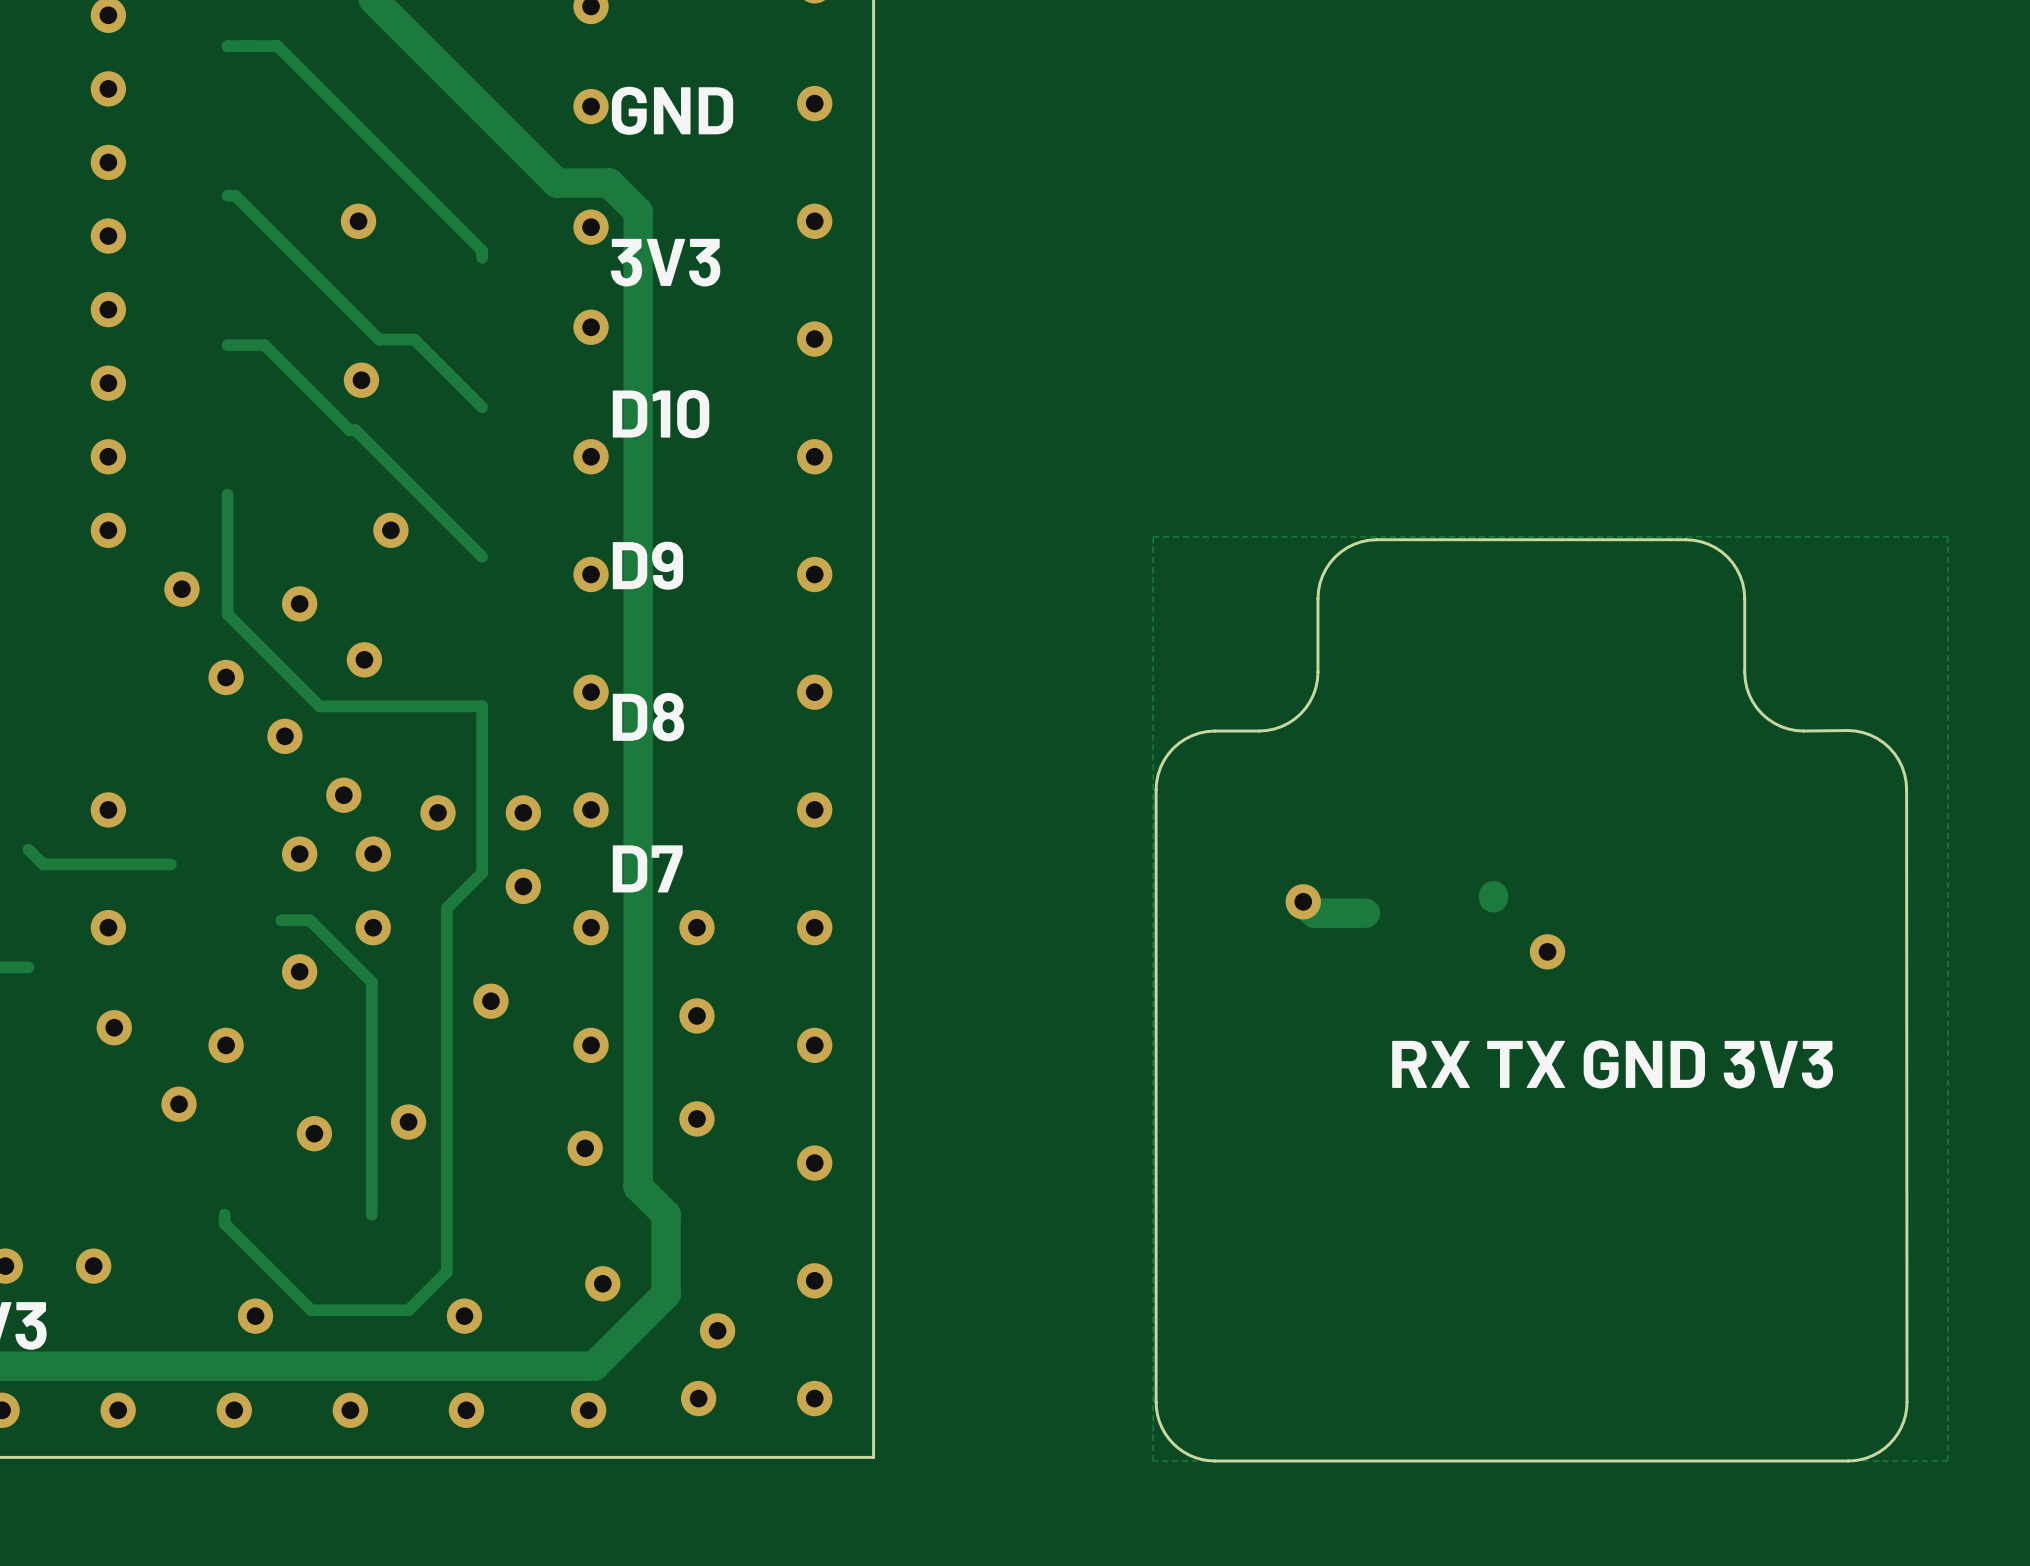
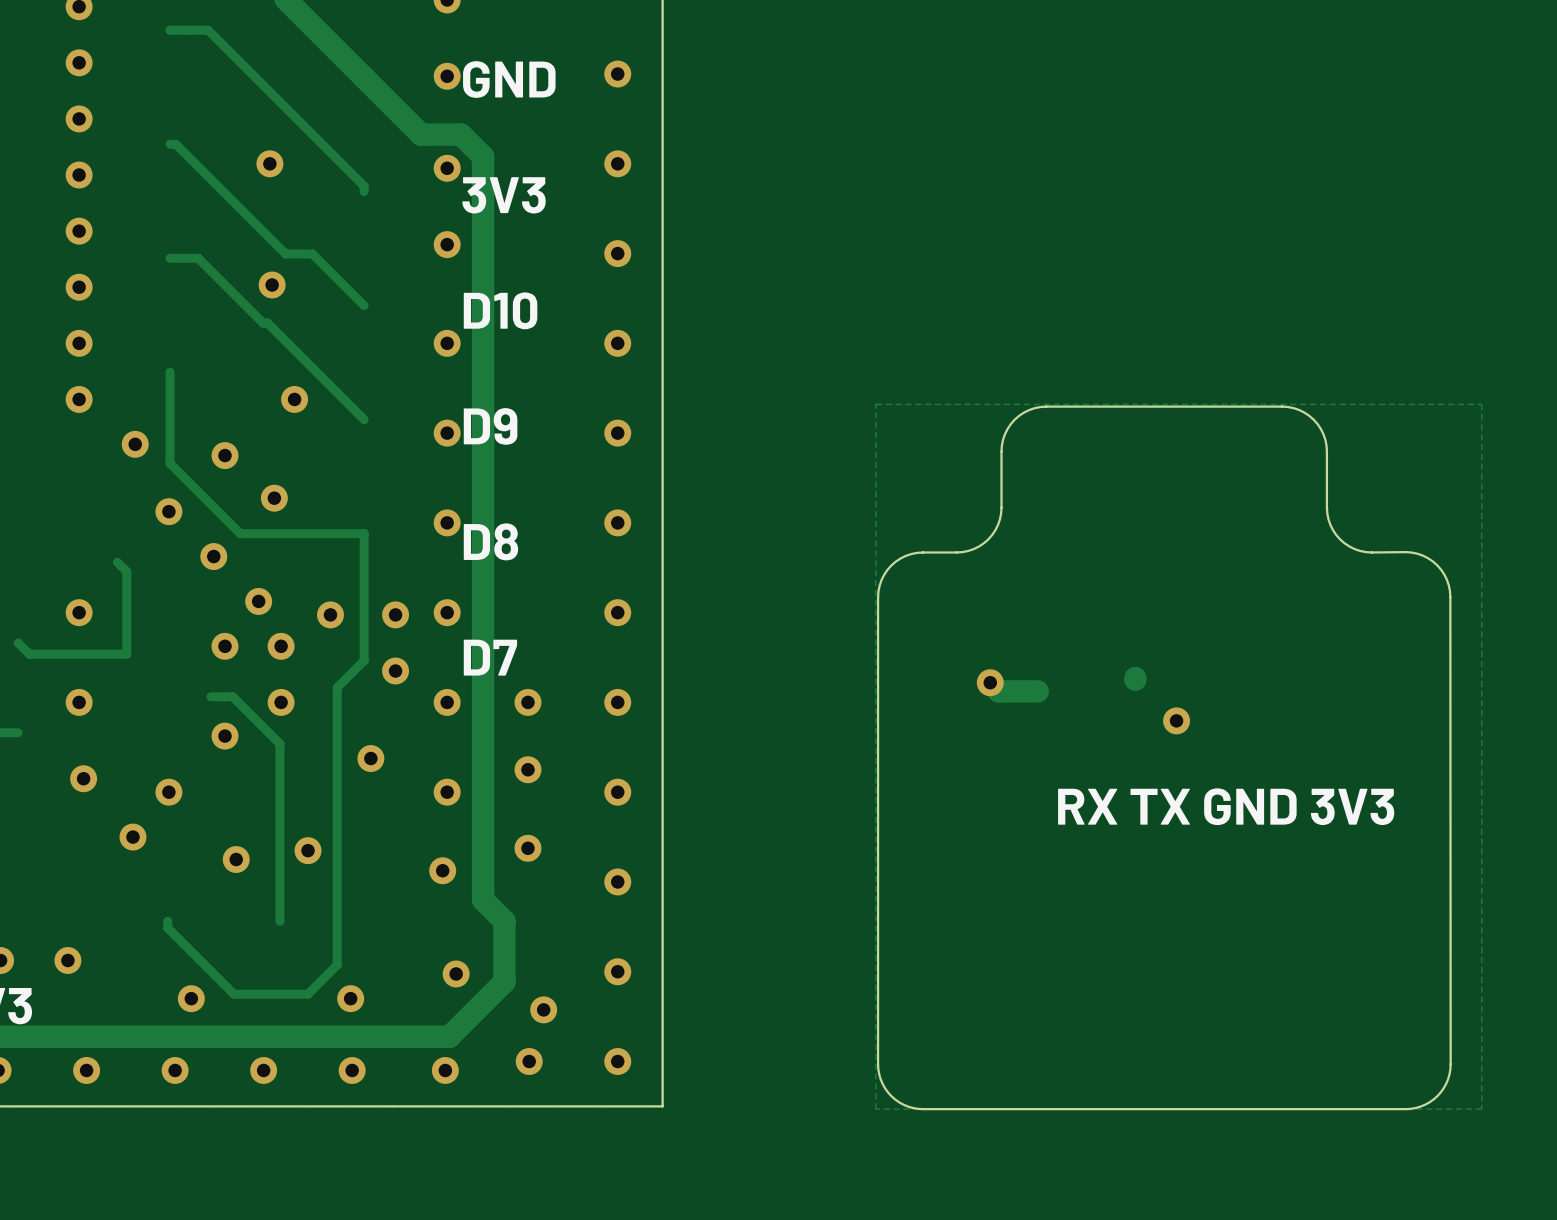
track: none -> (117, 562) (126, 571) (126, 654)

